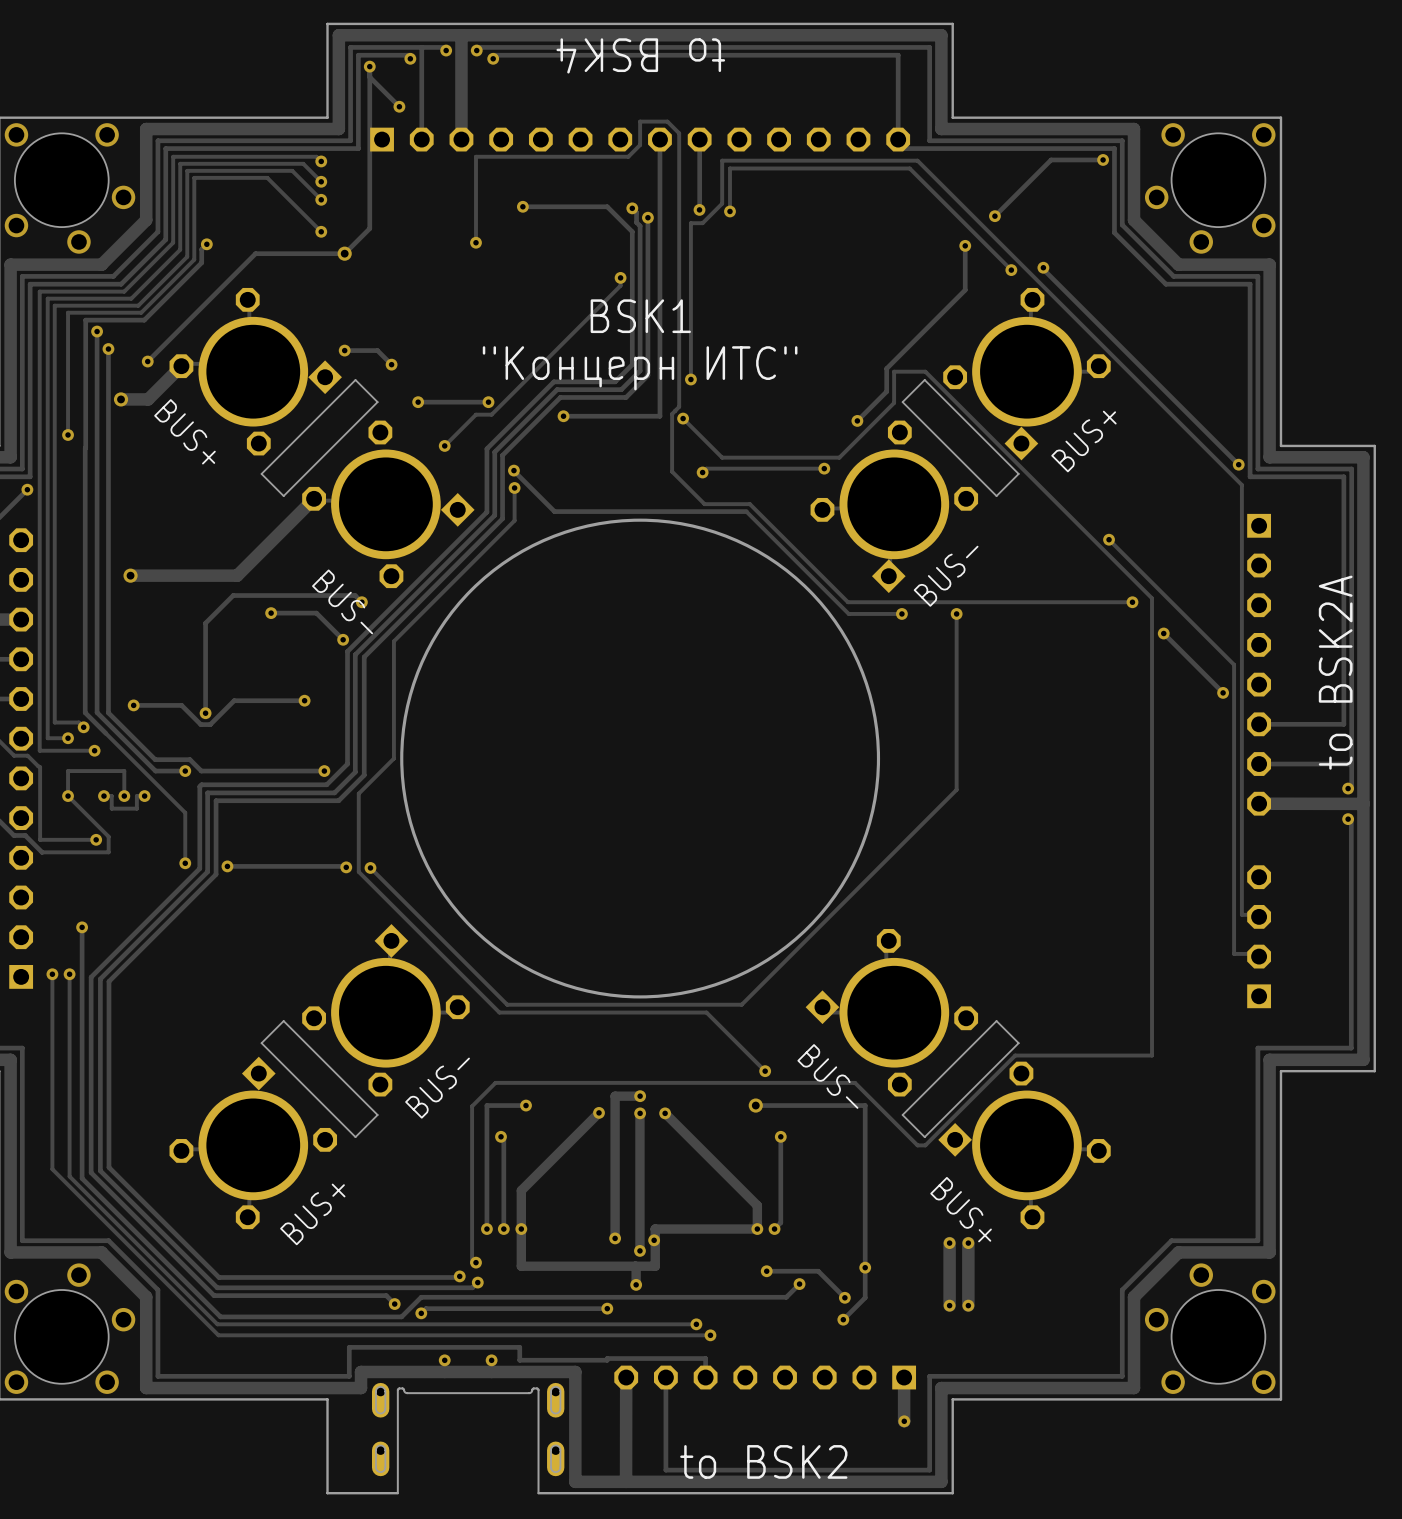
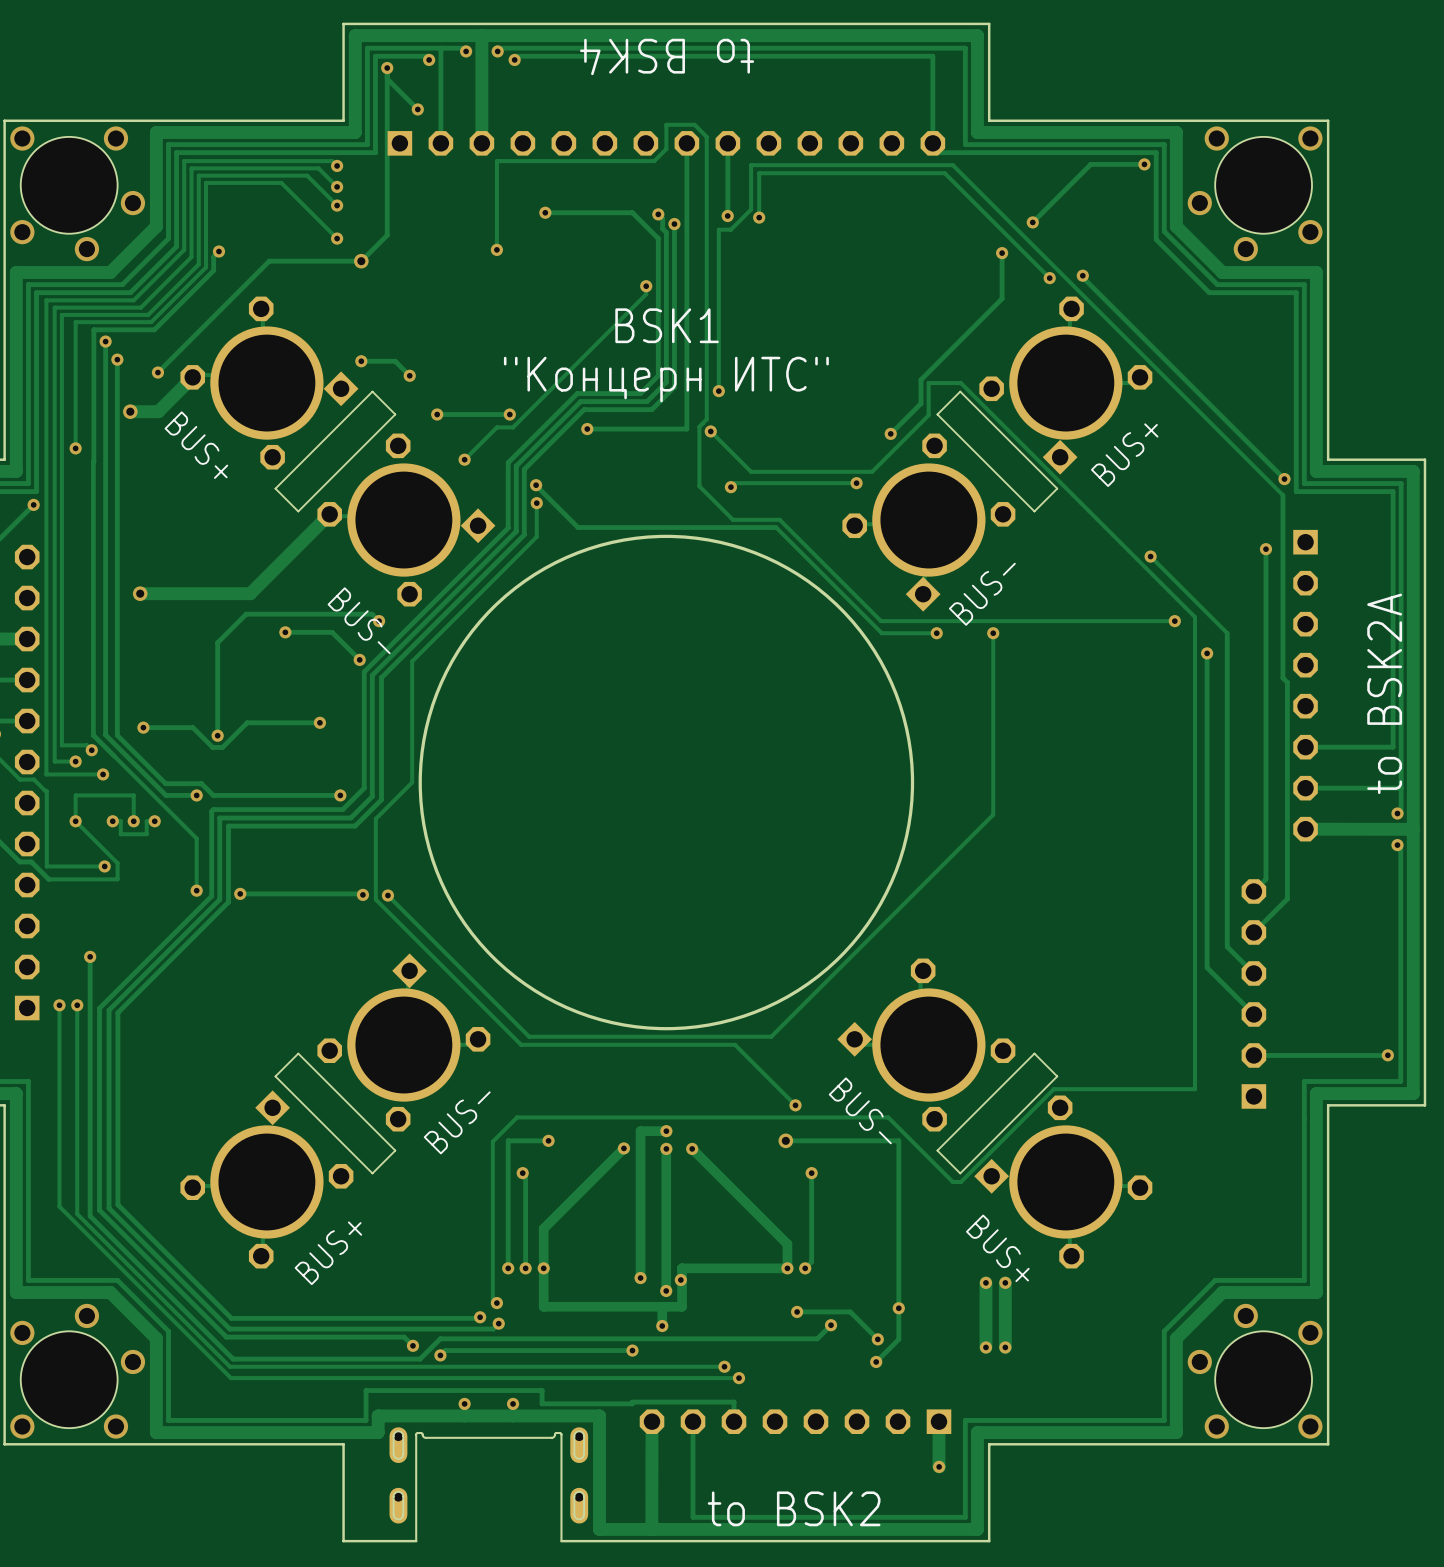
track: (1237, 480) (1241, 485) (1241, 914) (1257, 914) (1259, 916) -> (1282, 495) (1282, 678) (1287, 682) (1287, 898) (1253, 932)
track: none -> (1265, 549) (1265, 879) (1253, 891)
via: none -> (1265, 549)
track: (1183, 613) (1234, 664) (1234, 953) (1257, 953) (1259, 956) -> (1227, 633) (1227, 946) (1253, 973)
track: (1163, 633) (1223, 692) -> (1207, 653) (1207, 967) (1253, 1014)
via: (1223, 692) -> none
part: (1259, 936) -> none
part: none -> (1253, 993)
track: none -> (1387, 1055) (1253, 1055)
via: none -> (1387, 1055)

